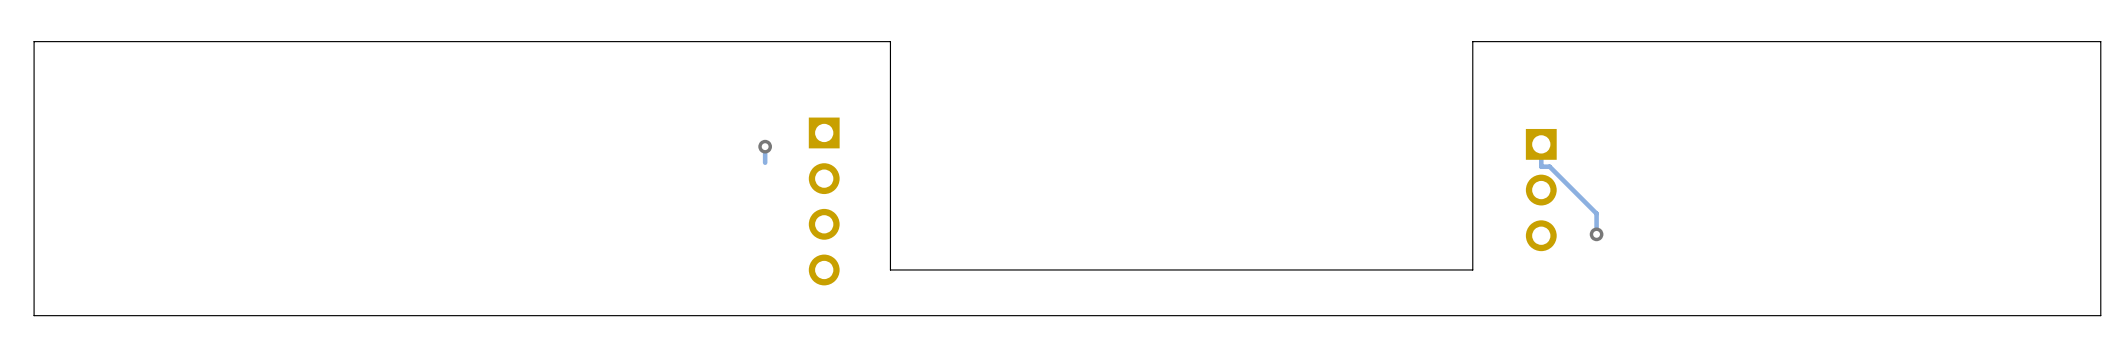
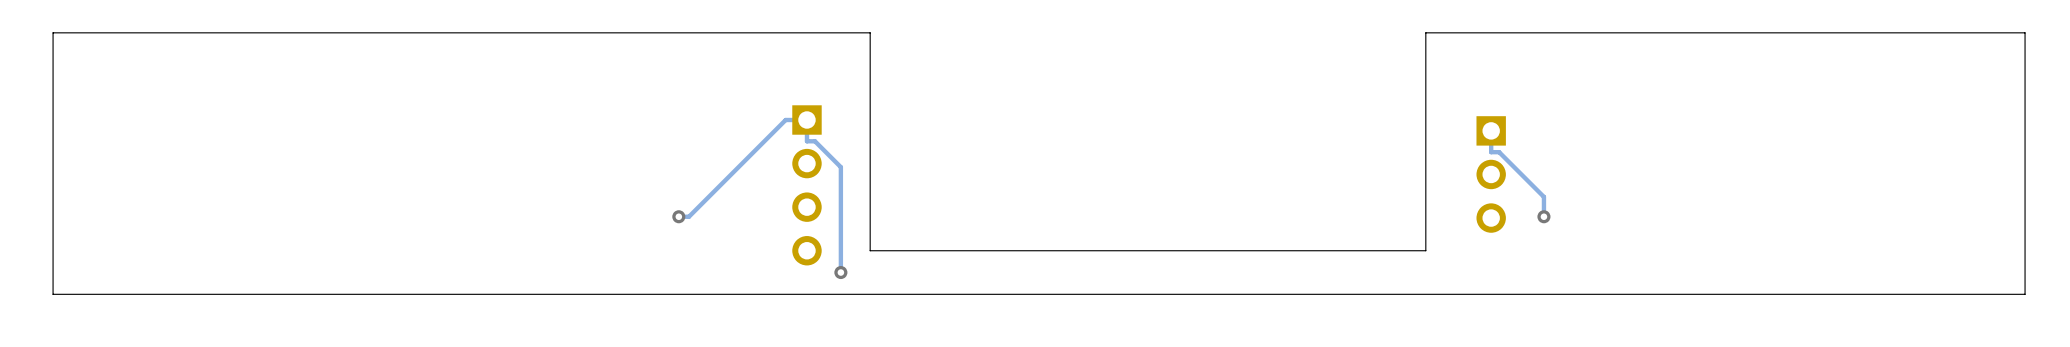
track: (765, 146) (765, 162) -> none
via: (765, 146) -> none
track: none -> (678, 216) (688, 216) (785, 120) (806, 120) (806, 141) (814, 141) (840, 167) (840, 272)
via: none -> (678, 216)
via: none -> (840, 272)

